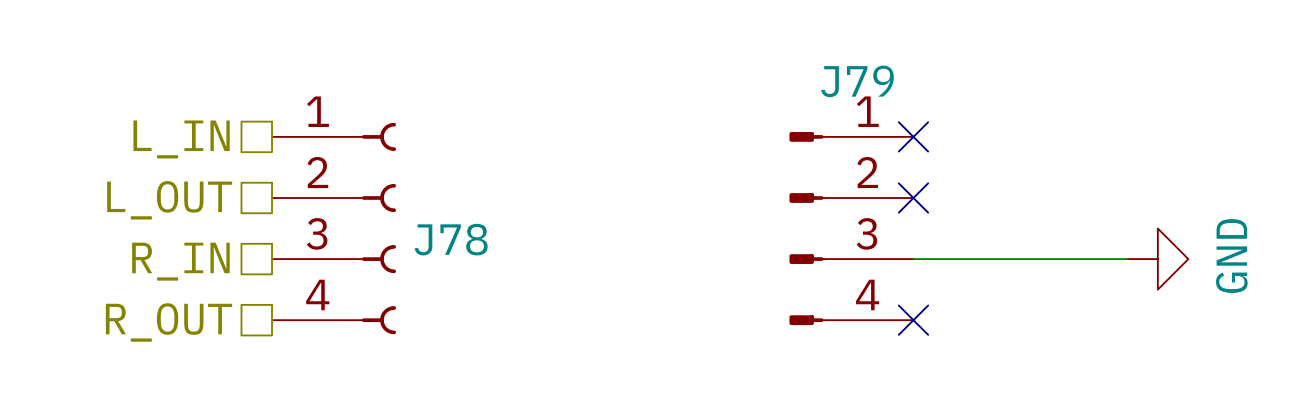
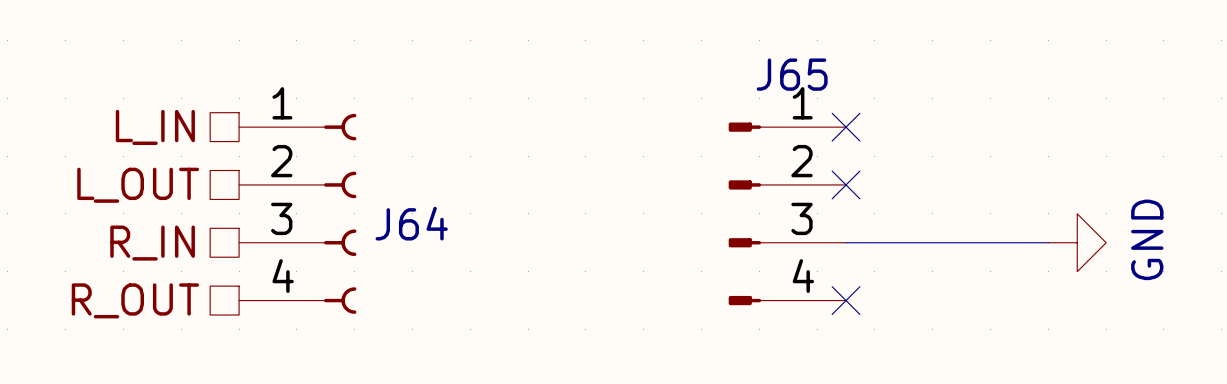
J79 name: J79 (857, 81) -> J65 (792, 74)
J78 name: J78 (451, 239) -> J64 (411, 223)

